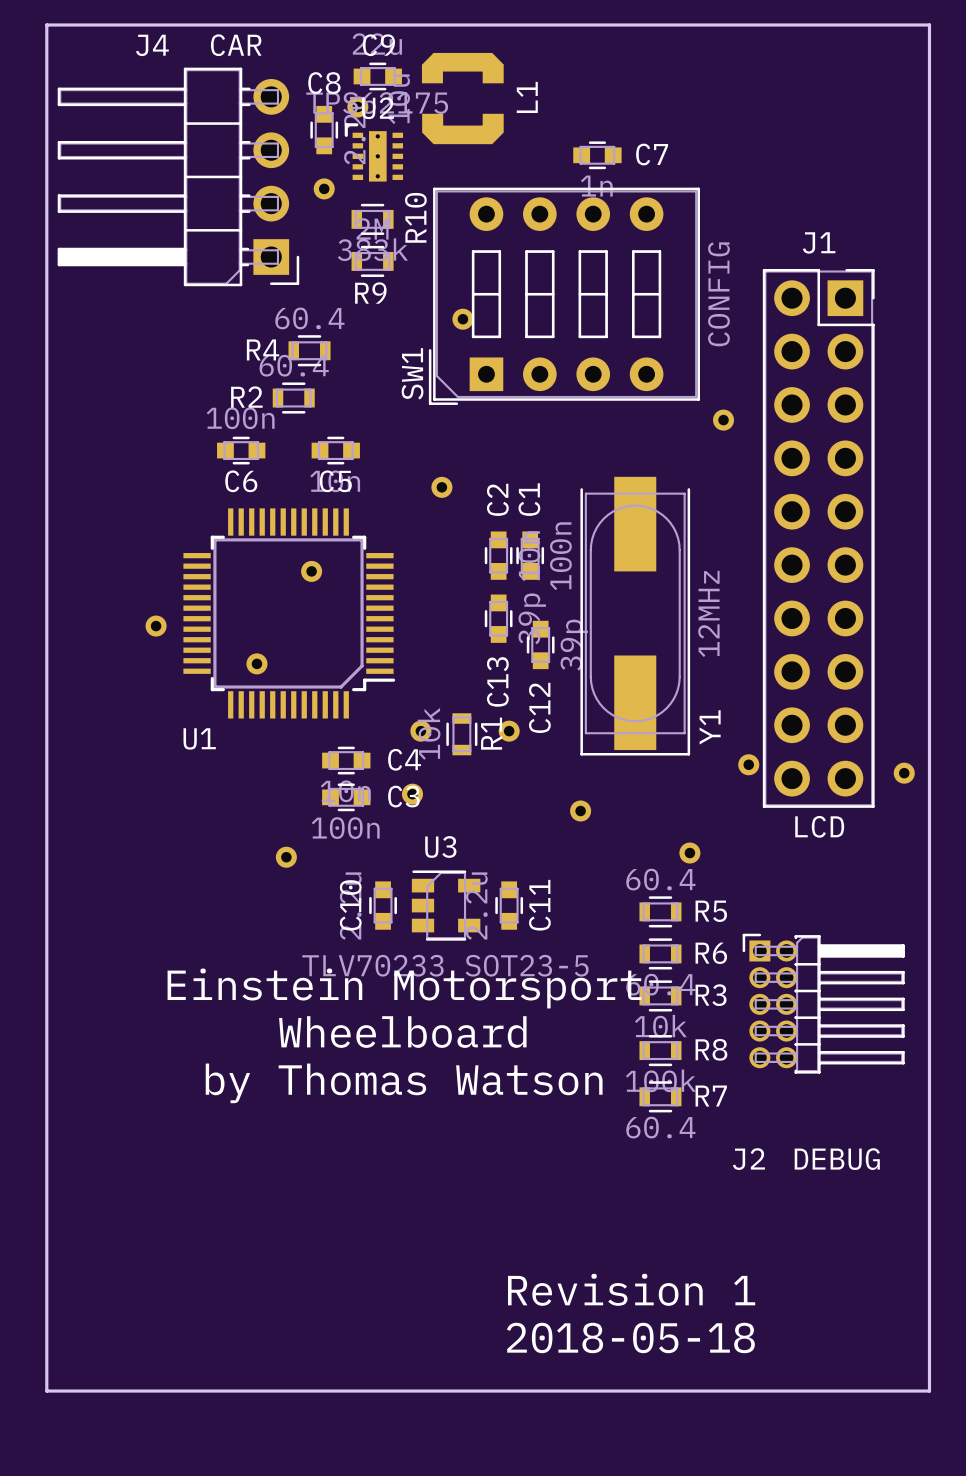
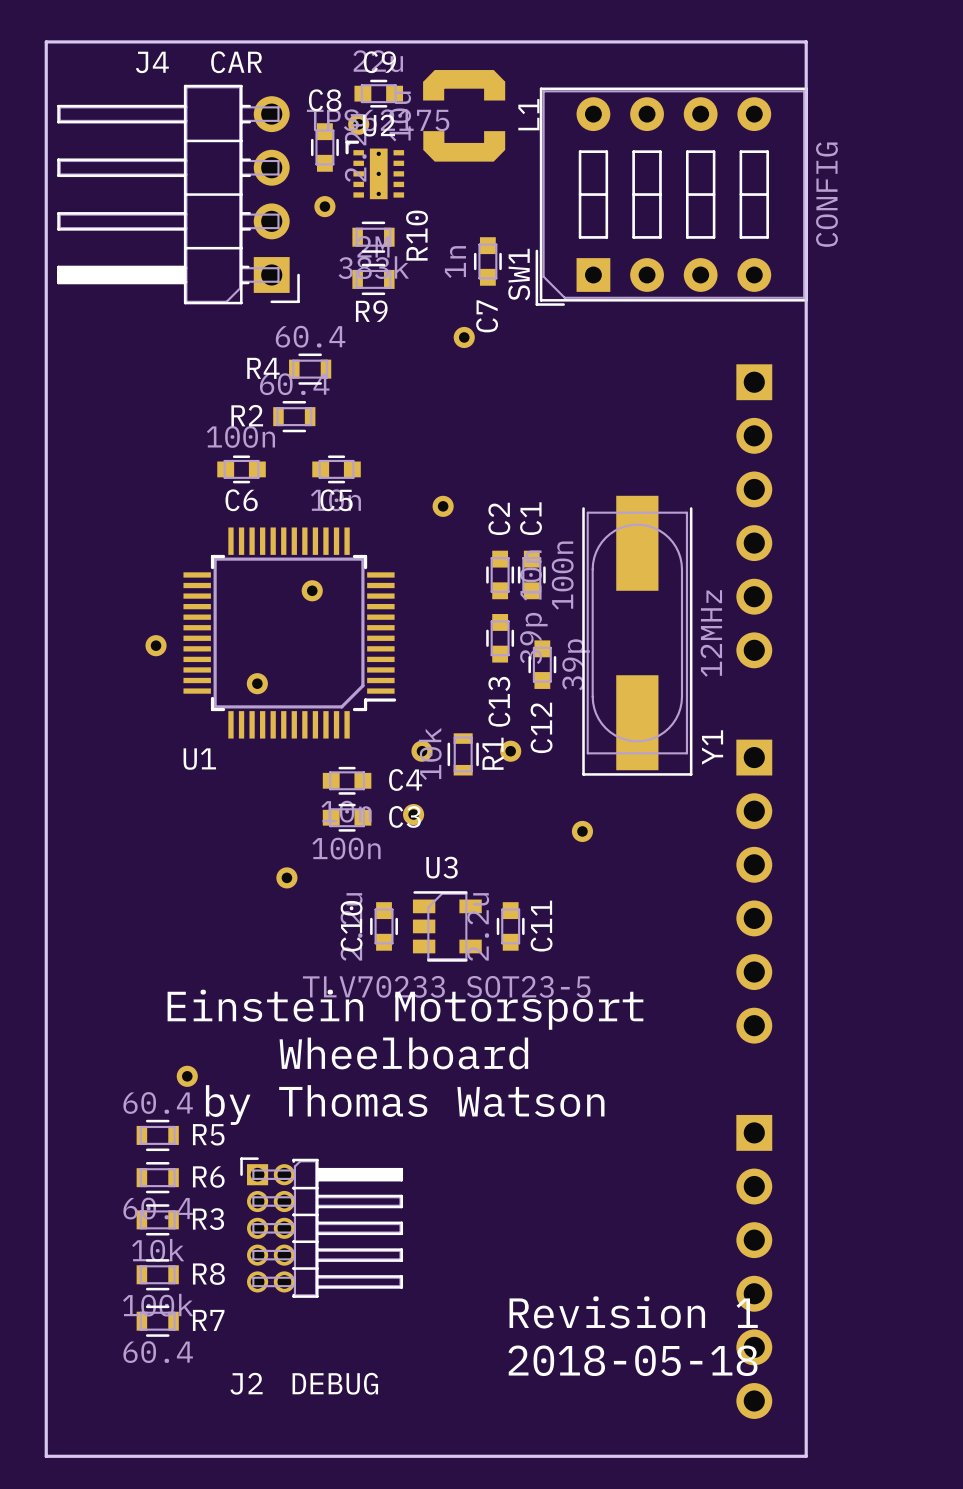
board edge: (803, 24) (929, 24) (929, 1391) (46, 1391) -> (806, 41) (806, 1456) (46, 1456) (46, 1414)
C7 rotation: 0° (597, 155) -> 90° clockwise (487, 261)
C7 position: (597, 155) -> (487, 261)
SW1 position: (564, 296) -> (671, 196)
part: (723, 420) -> none
part: none -> (754, 516)
J1: LCD (818, 538) -> none
part: (748, 764) -> none
part: (904, 773) -> none
part: (689, 853) -> none
part: none -> (754, 891)
R5 position: (660, 911) -> (157, 1135)
R6 position: (660, 953) -> (157, 1177)
R3 position: (660, 995) -> (157, 1219)
J2 position: (823, 1003) -> (321, 1227)
R8 position: (660, 1050) -> (157, 1274)
part: none -> (187, 1076)
R7 position: (660, 1096) -> (157, 1321)
part: none -> (754, 1266)

